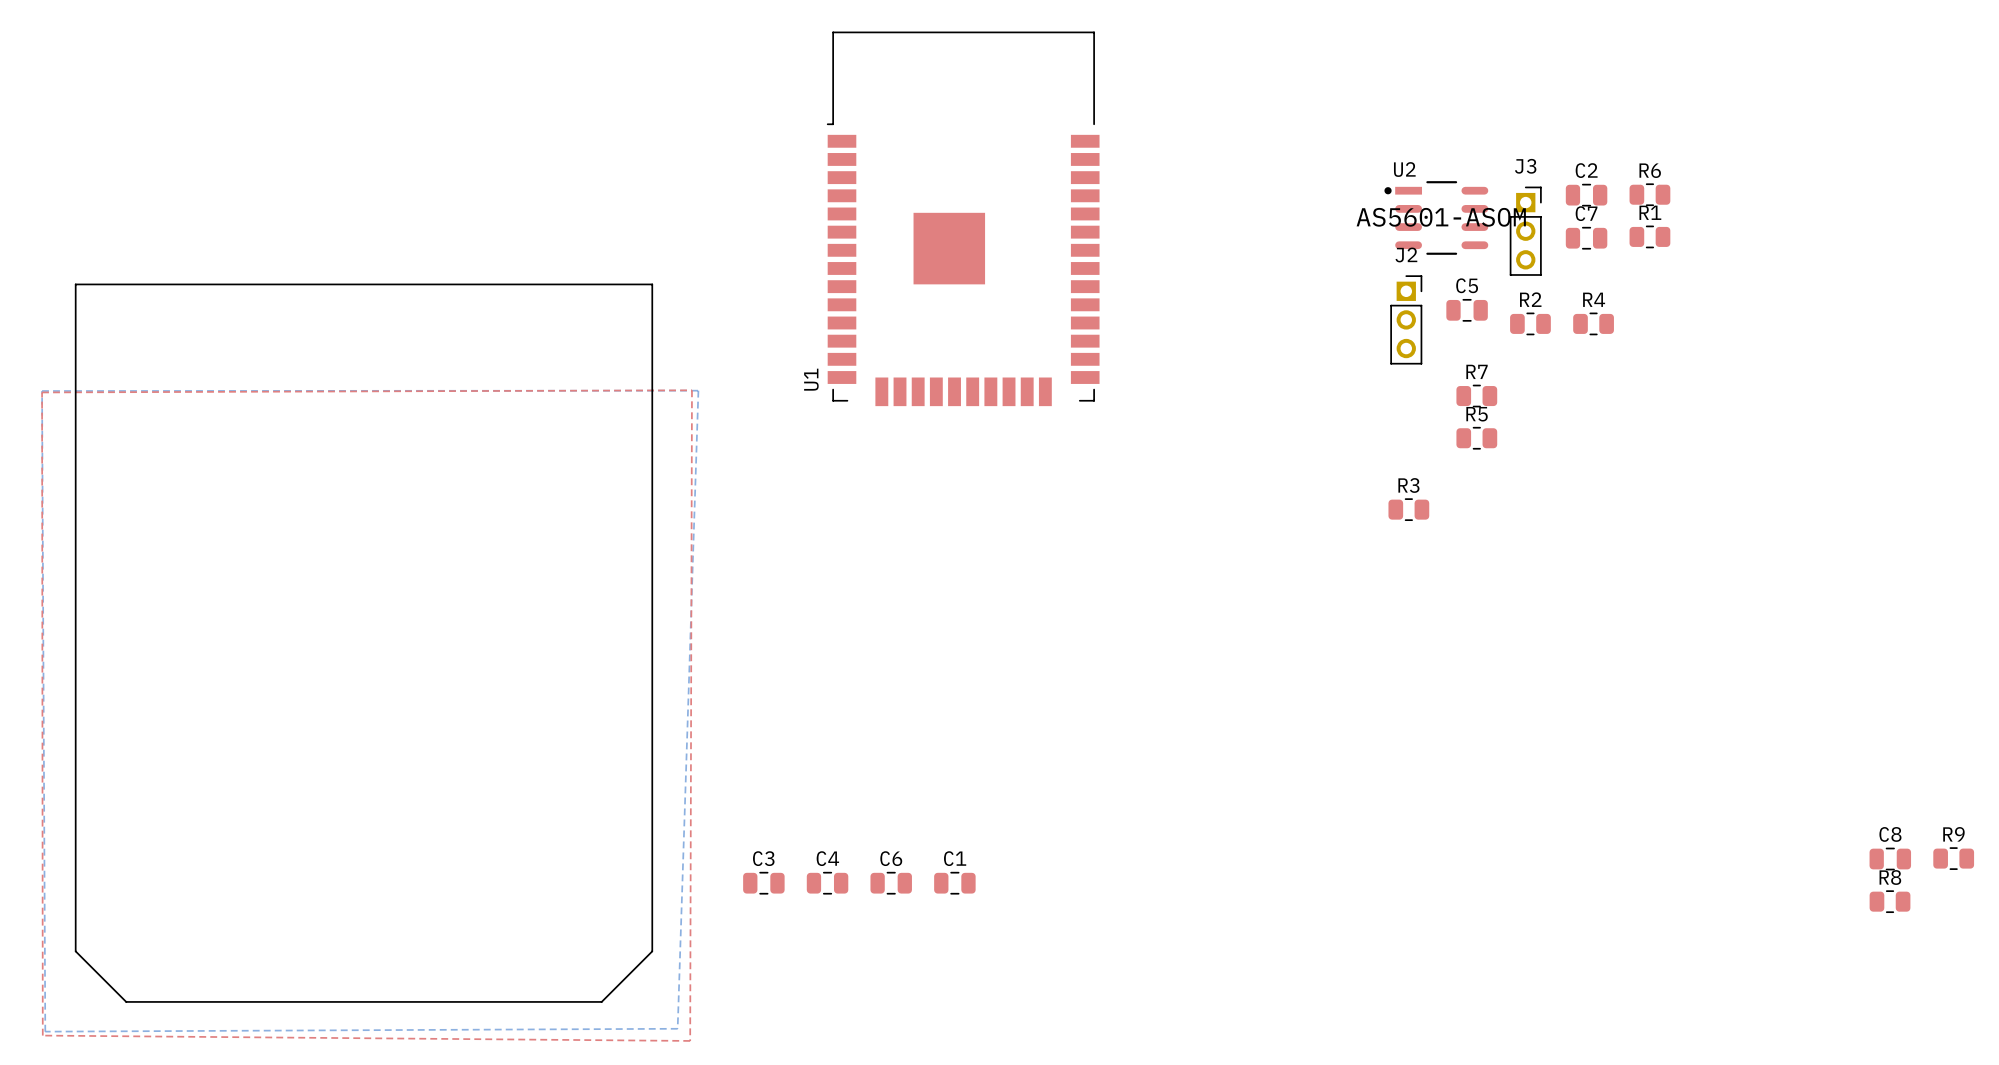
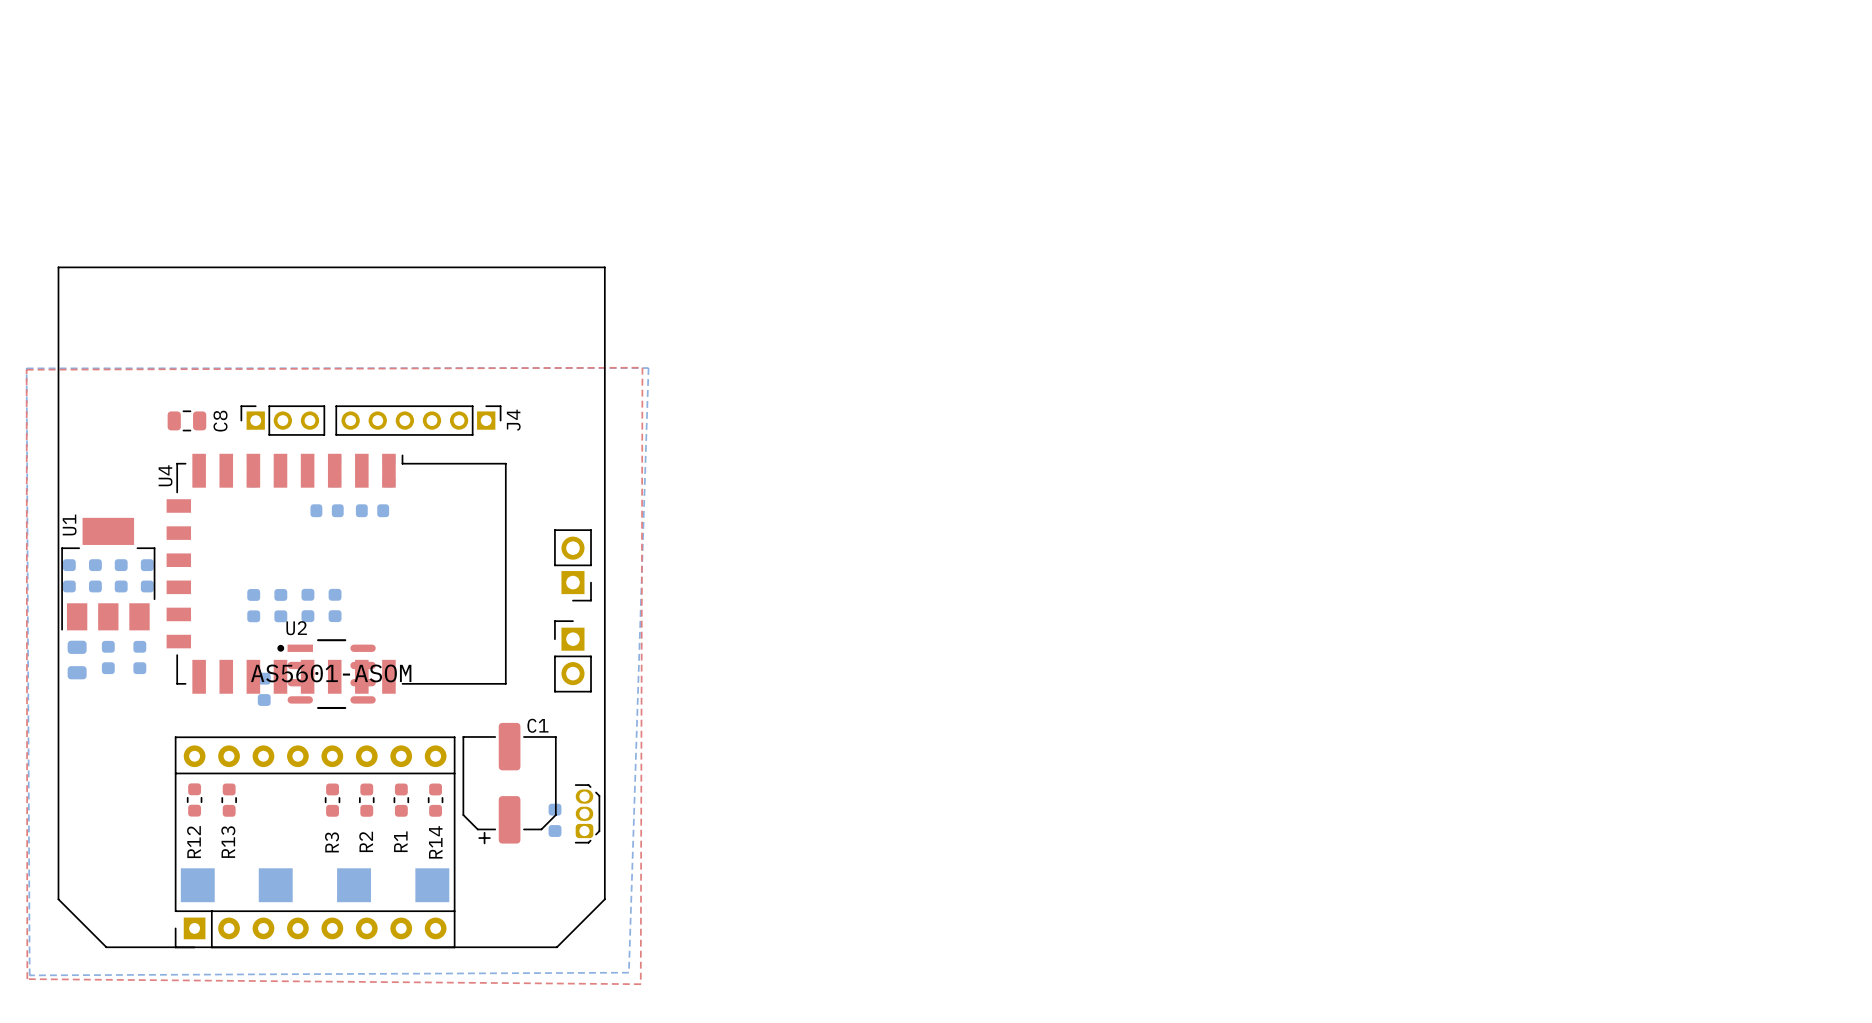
U1 footprint: [826, 31, 1100, 407] -> [61, 517, 156, 631]
R6: (1649, 194) -> none
C2: (1586, 195) -> none
R1 name position: R1 (1650, 212) -> R1 (400, 841)
U2 position: (1436, 217) -> (326, 674)
R1 footprint: [1629, 225, 1671, 249] -> [393, 783, 410, 817]
J3: (1525, 231) -> none
C7: (1586, 238) -> none
R2 name position: R2 (1530, 299) -> R2 (366, 841)
C5: (1467, 310) -> none
R2 footprint: [1510, 312, 1551, 336] -> [359, 783, 375, 817]
J2: (1406, 319) -> none
R4: (1593, 323) -> none
U1 name position: U1 (811, 379) -> U1 (69, 524)
R7: (1476, 396) -> none
R5: (1476, 438) -> none
part: none -> (282, 420)
J4: none -> (418, 420)
R3 name position: R3 (1408, 485) -> R3 (332, 842)
R3 footprint: [1388, 498, 1430, 522] -> [324, 783, 341, 817]
part: none -> (327, 510)
part: none -> (372, 510)
part: none -> (572, 565)
U4: none -> (336, 573)
part: none -> (69, 575)
part: none -> (95, 575)
part: none -> (121, 575)
part: none -> (147, 575)
part: none -> (253, 605)
part: none -> (280, 605)
part: none -> (307, 605)
part: none -> (335, 605)
part: none -> (572, 656)
part: none -> (108, 657)
part: none -> (139, 657)
part: none -> (77, 660)
part: none -> (264, 689)
C8 name position: C8 (1890, 834) -> C8 (220, 421)
R12: none -> (194, 799)
R13: none -> (229, 800)
R14: none -> (435, 800)
C8 footprint: [1869, 847, 1912, 871] -> [167, 410, 207, 432]
C1 name position: C1 (955, 858) -> C1 (537, 725)
R9: (1953, 858) -> none
part: none -> (587, 813)
part: none -> (555, 820)
C1 footprint: [934, 871, 976, 895] -> [462, 722, 557, 845]
C3: (763, 883) -> none
C4: (827, 883) -> none
C6: (891, 883) -> none
part: none -> (315, 842)
R8: (1890, 901) -> none
part: none -> (197, 885)
part: none -> (275, 885)
part: none -> (354, 885)
part: none -> (432, 885)

